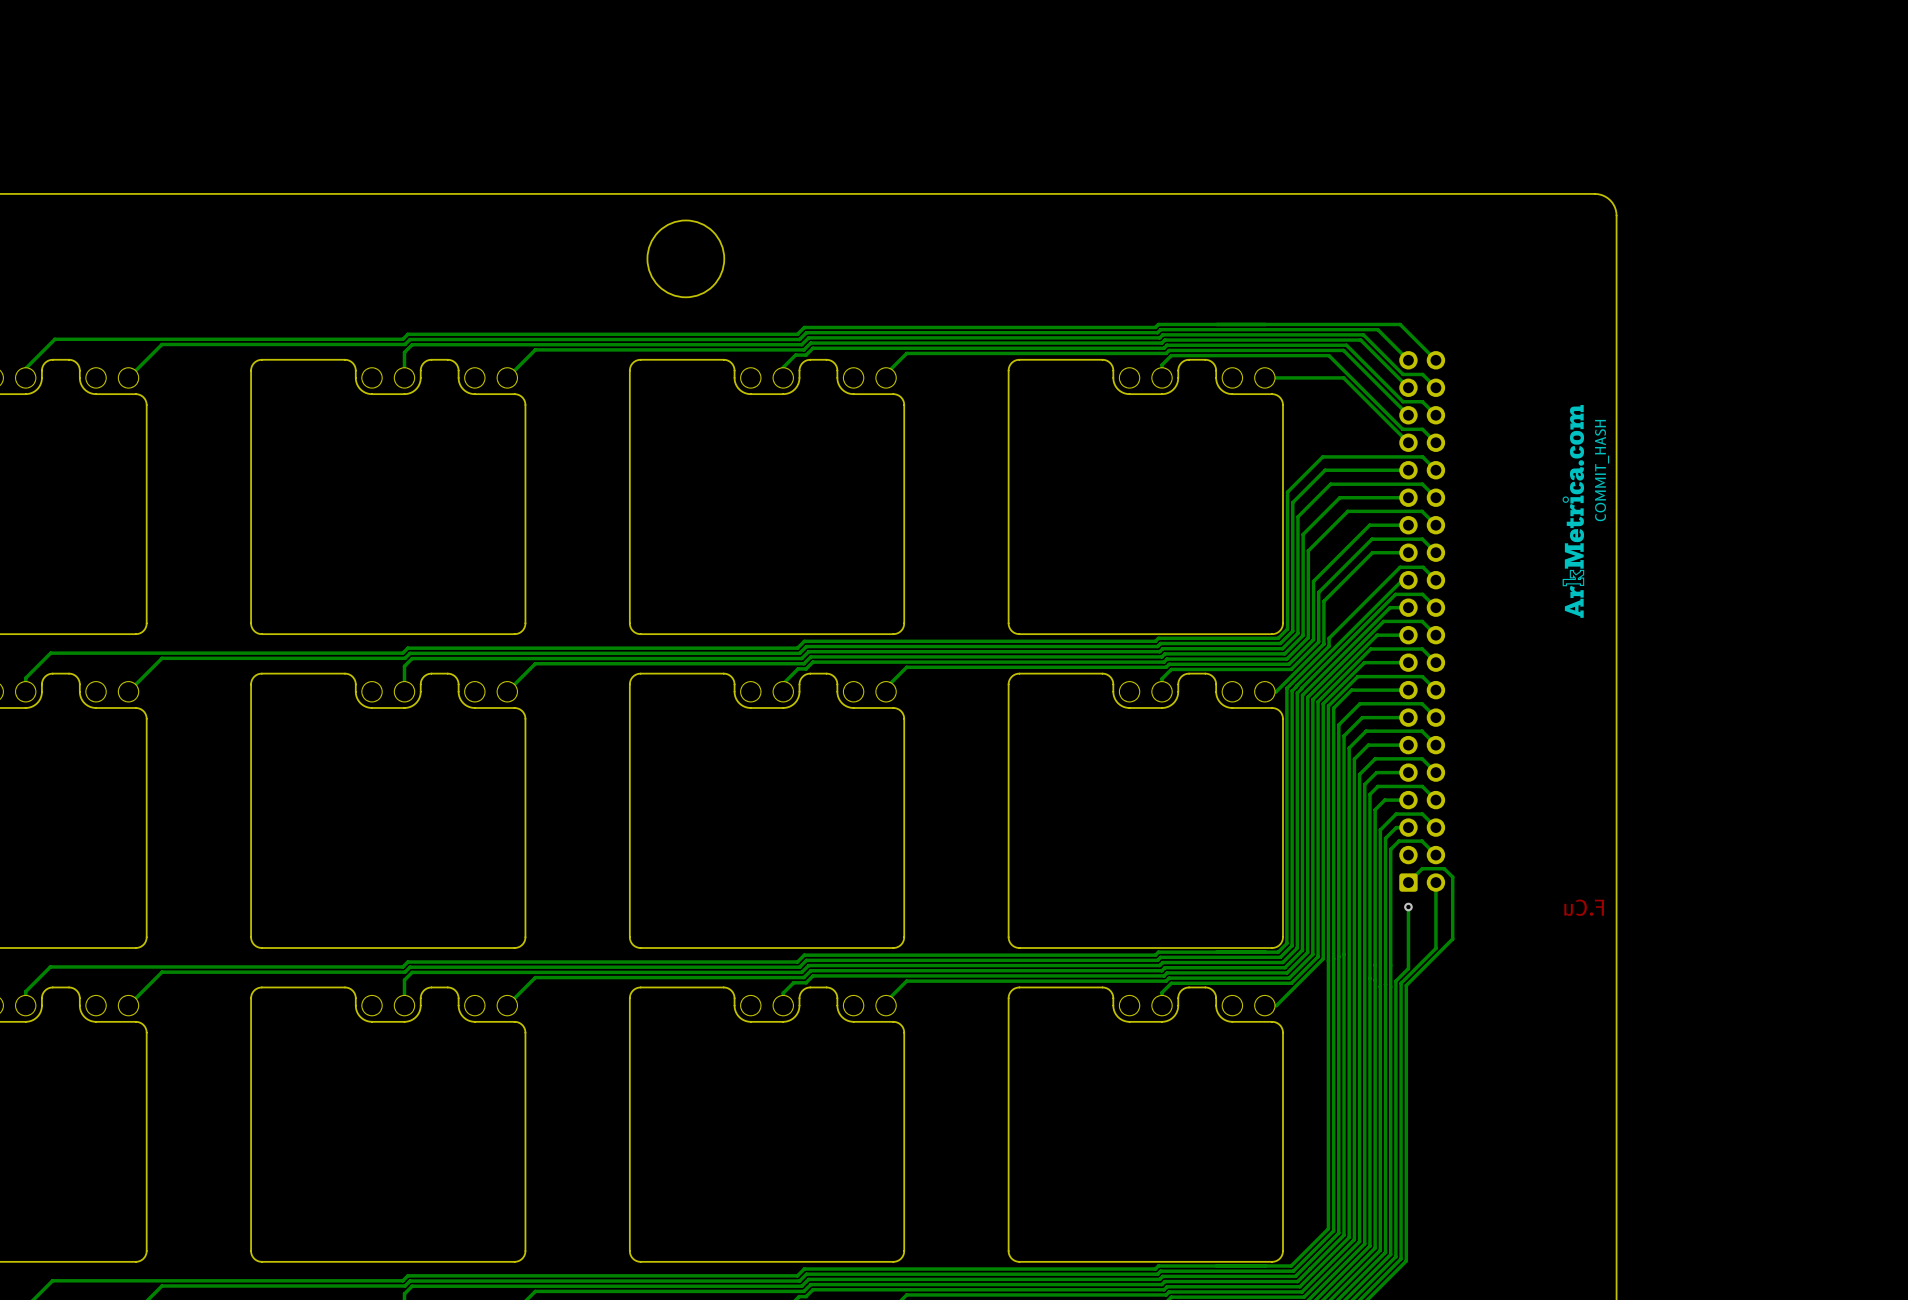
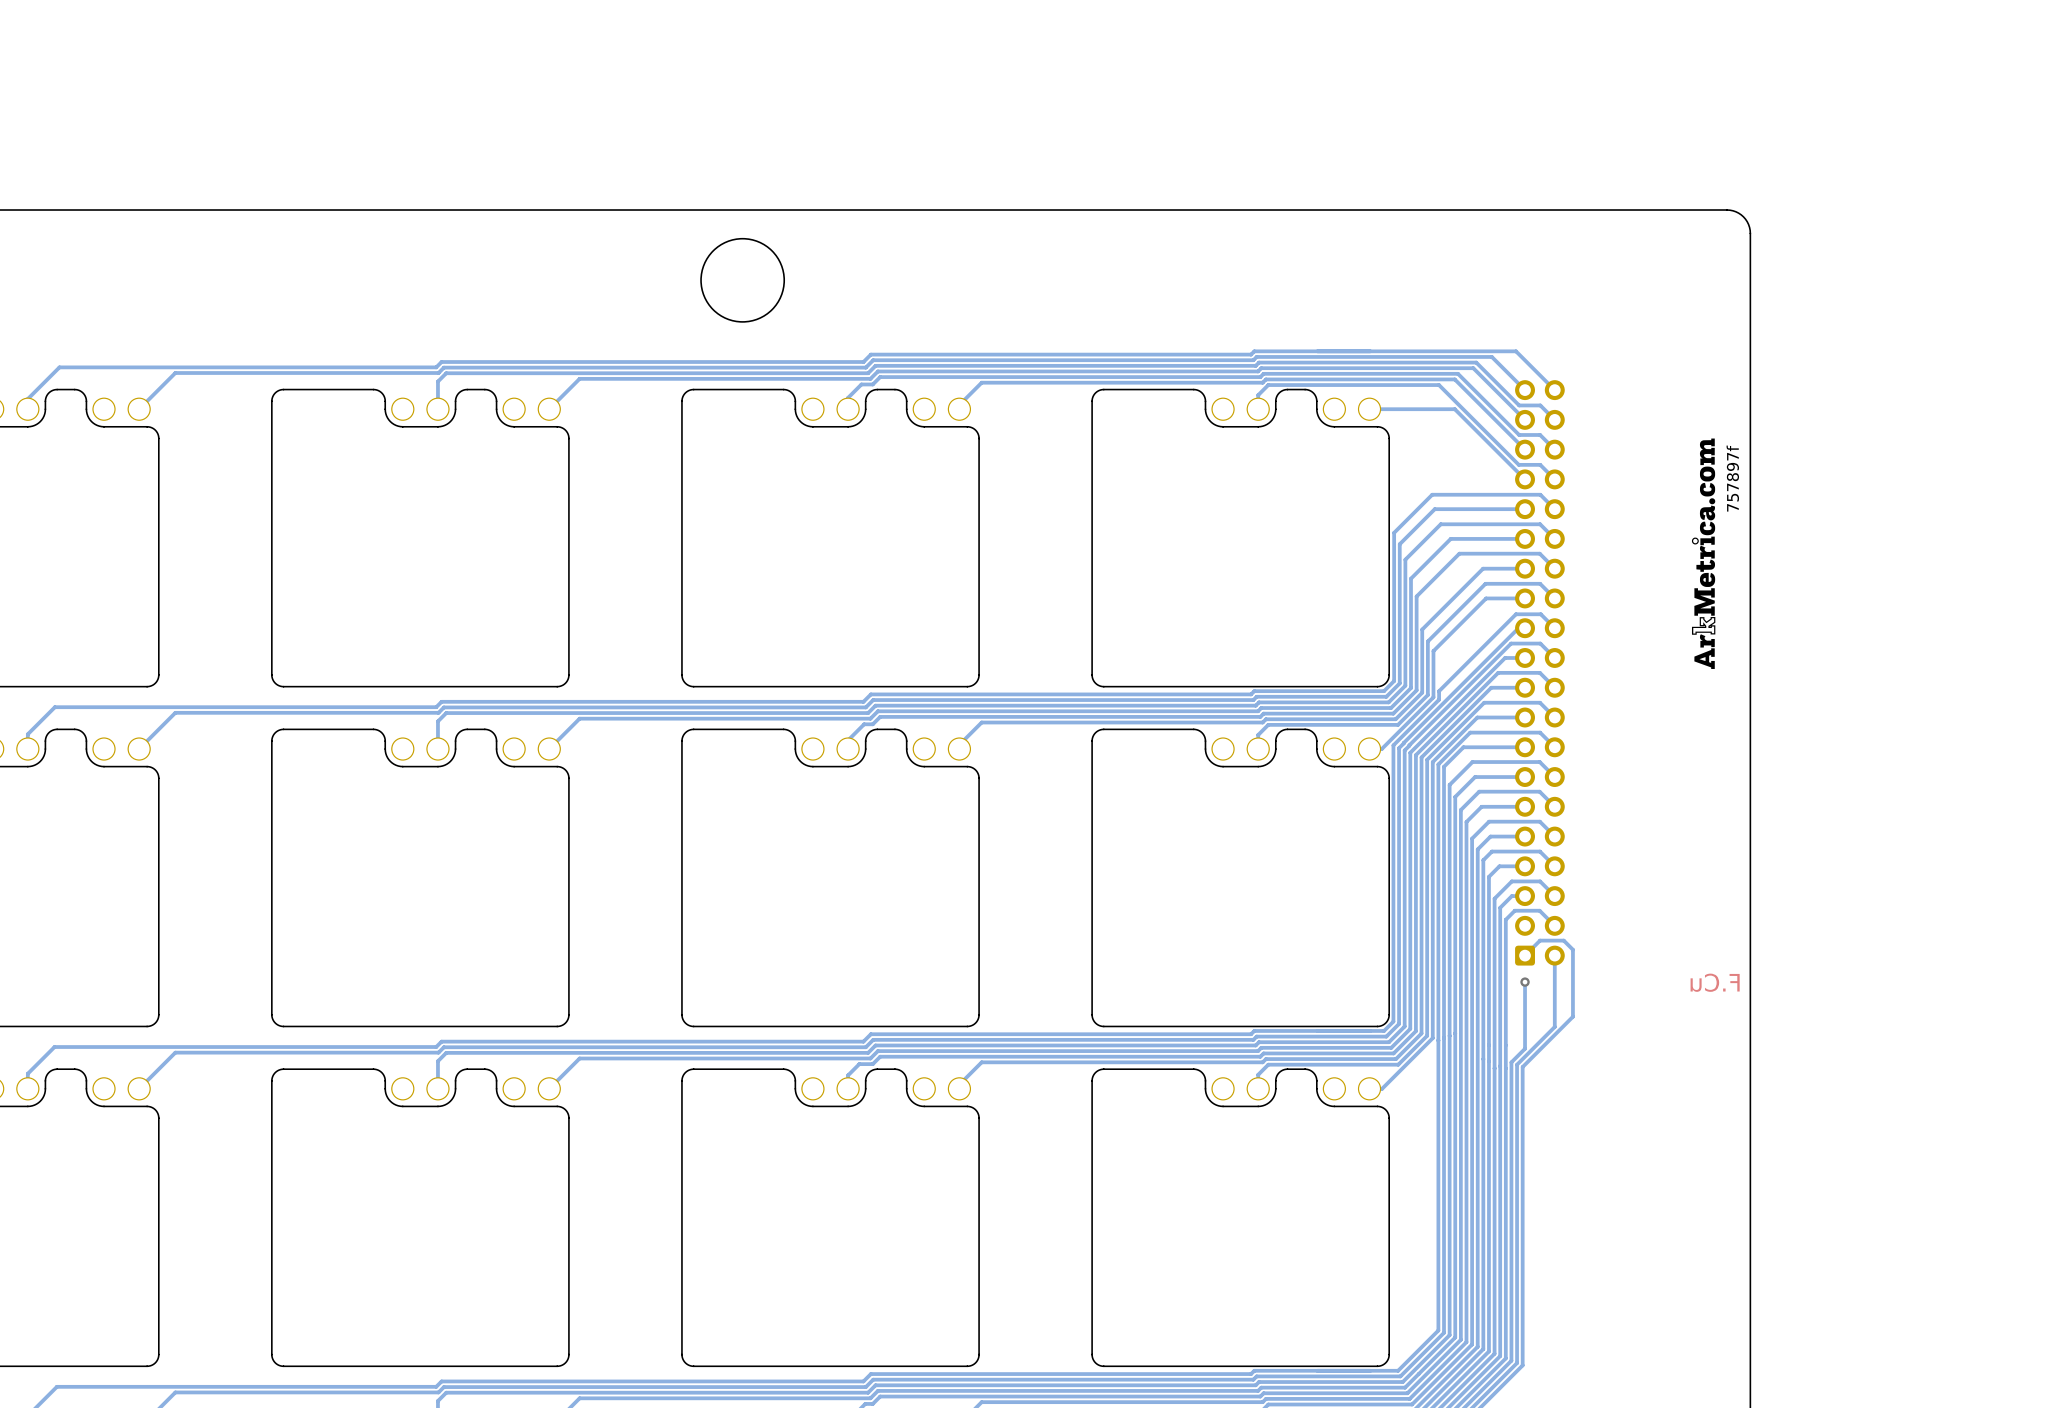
text: none -> 757897f (1732, 478)
text: COMMIT_HASH (1602, 470) -> none

